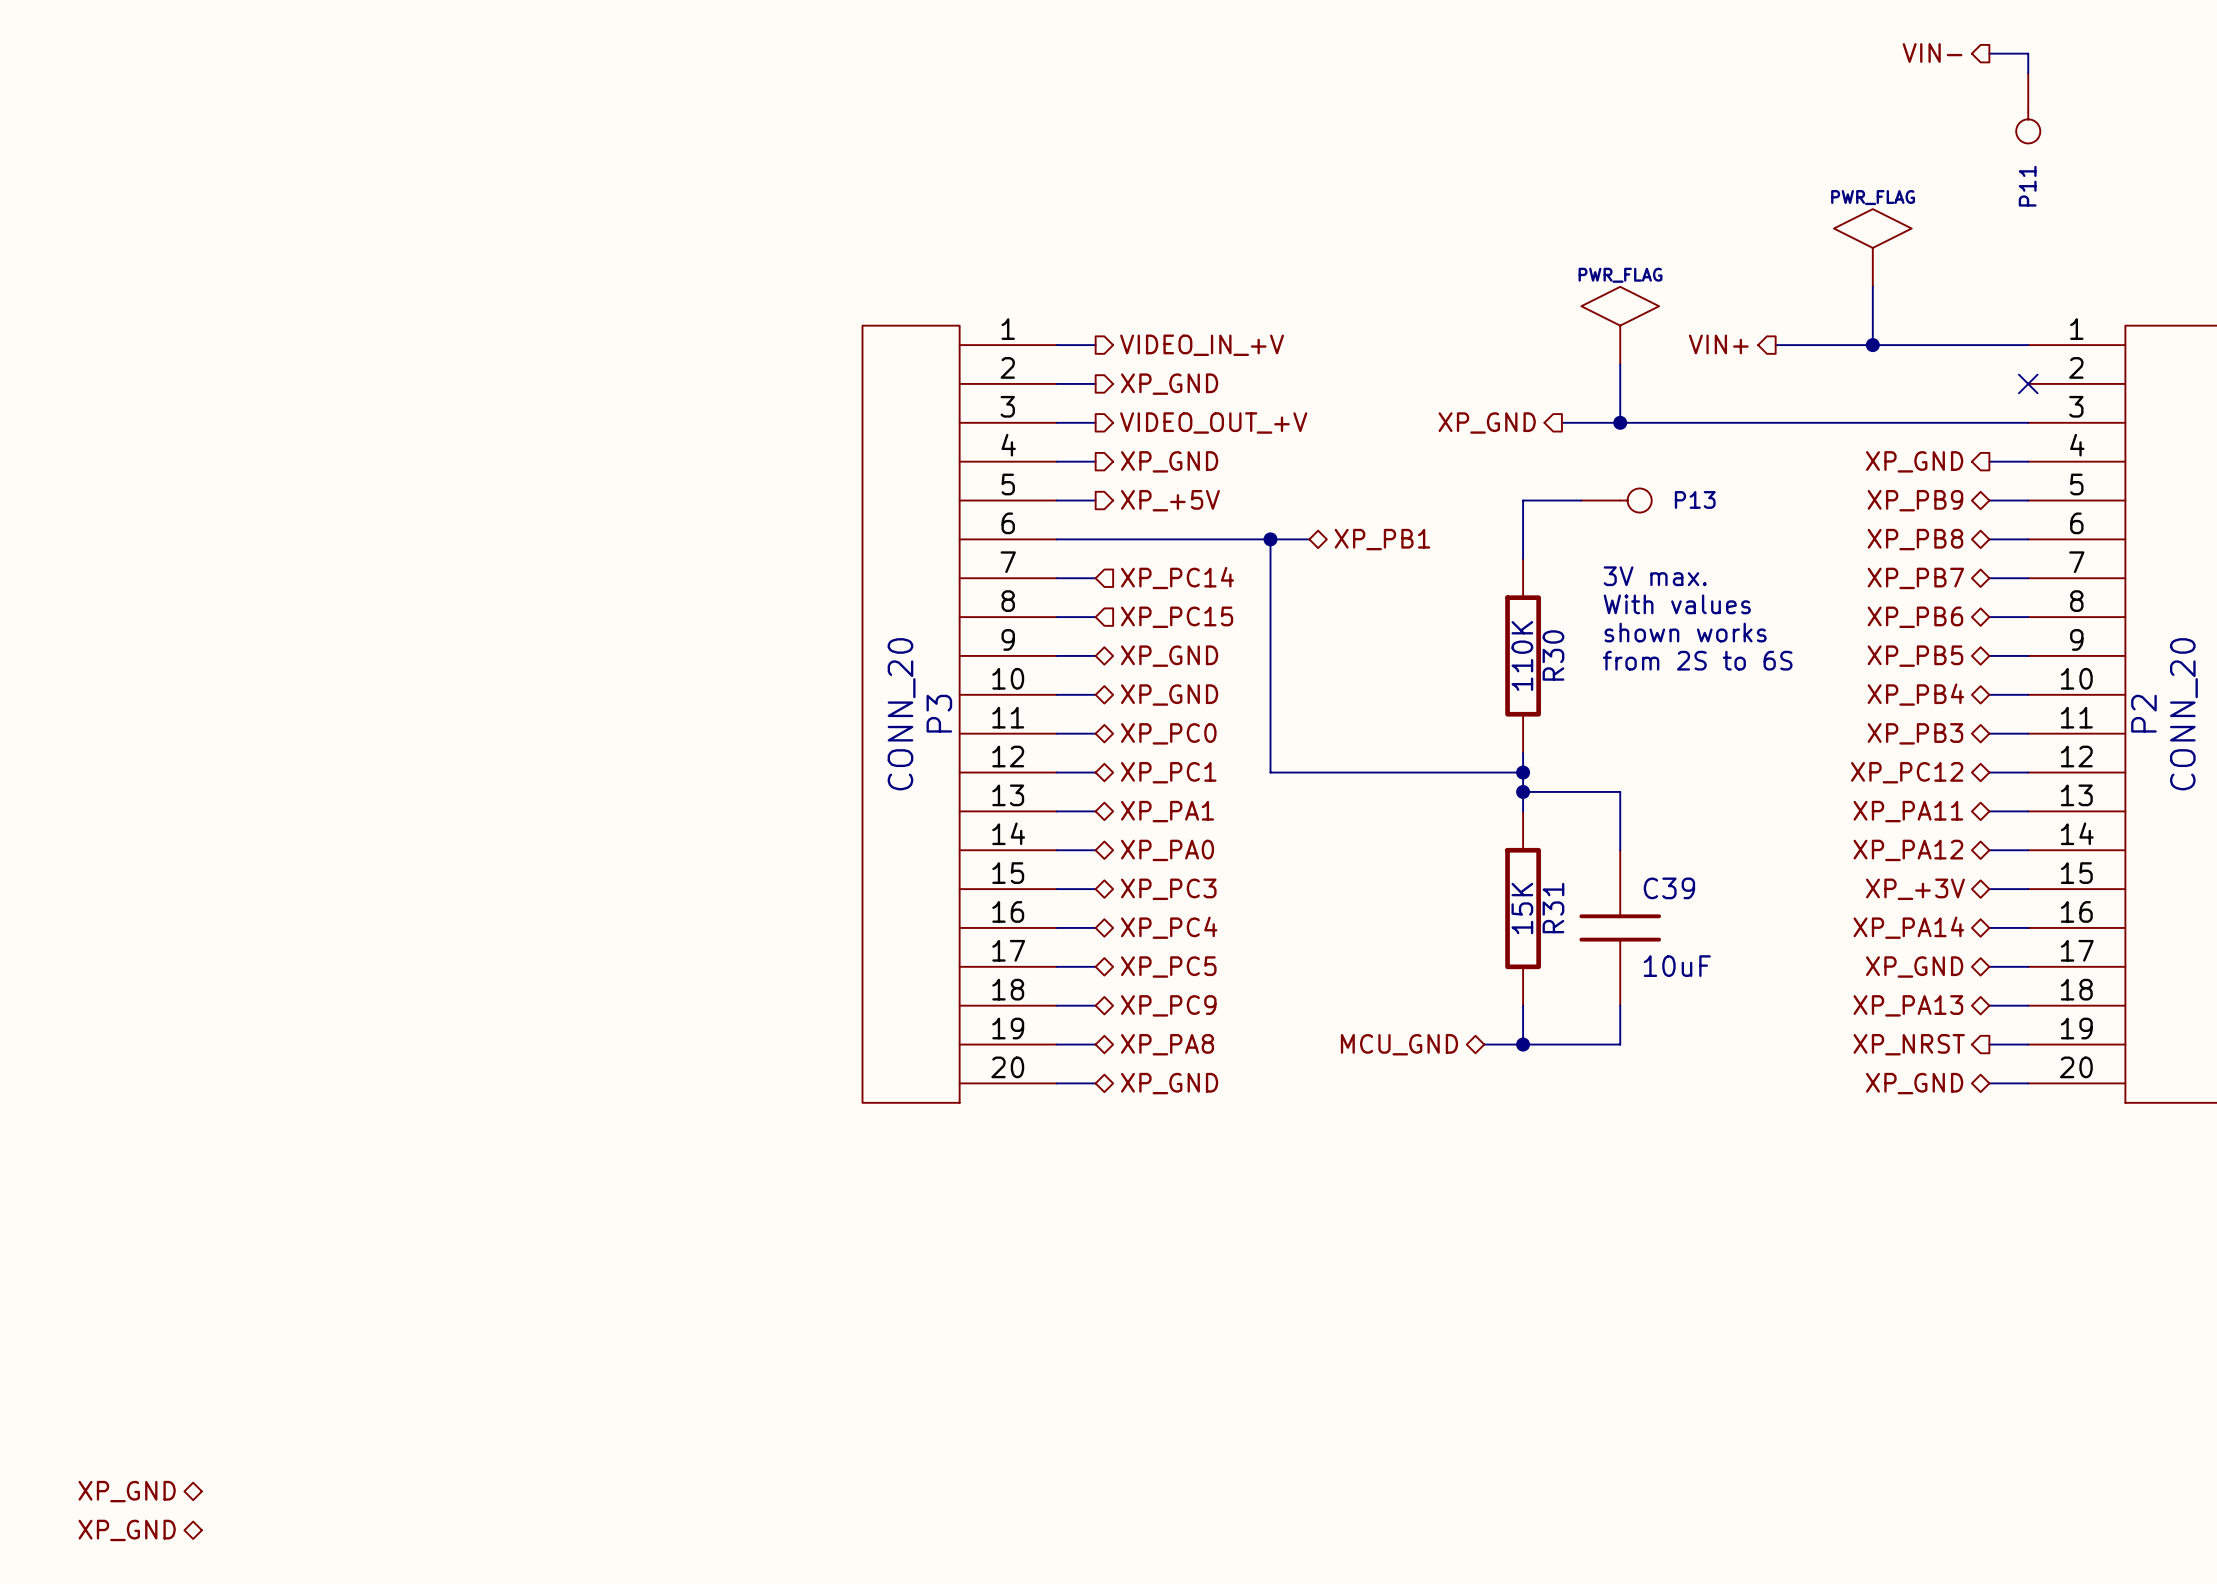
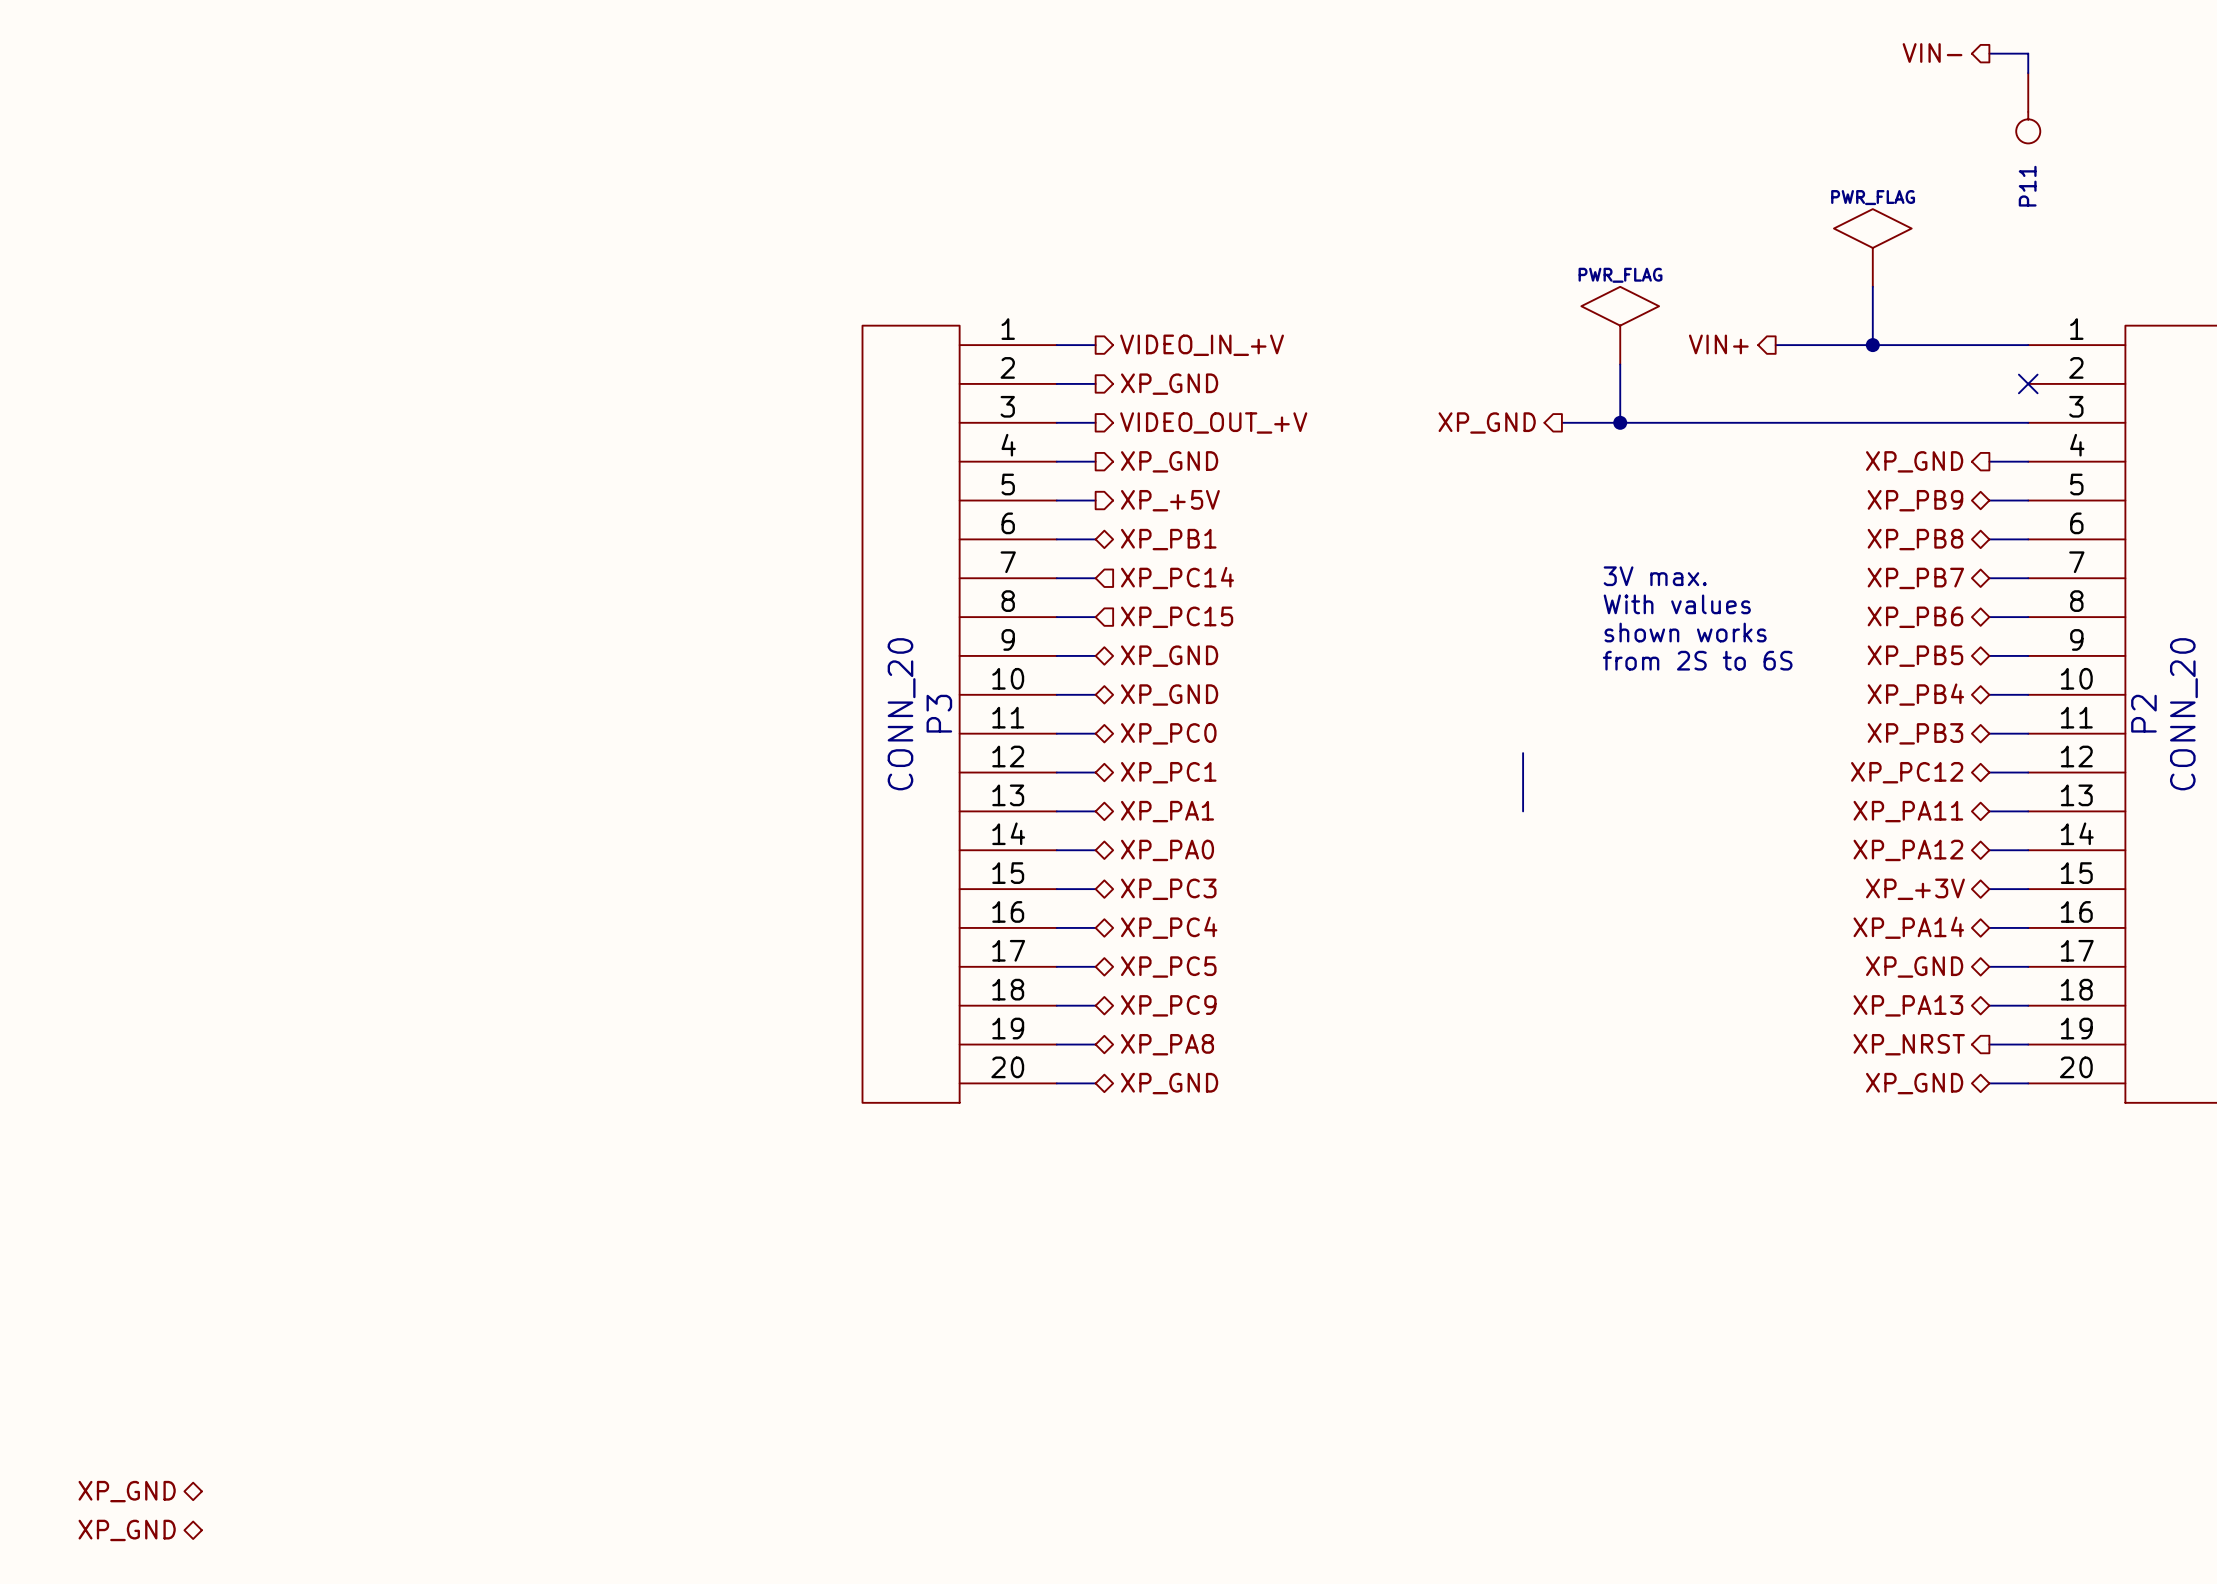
wire: (1581, 500) (1523, 500) (1523, 558) -> none
P13: (1616, 500) -> none
wire: (1095, 539) (1309, 539) -> none
wire: (1270, 539) (1270, 772) (1523, 772) -> none
junction: (1270, 539) -> none
hierarchical label position: XP_PB1 (1382, 539) -> XP_PB1 (1168, 539)
R30: 110K (1523, 655) -> none
junction: (1523, 772) -> none
wire: (1523, 791) (1620, 791) (1620, 850) -> none
junction: (1523, 791) -> none
R31: 15K (1523, 908) -> none
C39: 10uF (1620, 927) -> none
wire: (1523, 1005) (1523, 1044) -> none
wire: (1620, 1005) (1620, 1044) (1484, 1044) -> none
hierarchical label: MCU_GND (1399, 1044) -> none
junction: (1523, 1044) -> none

